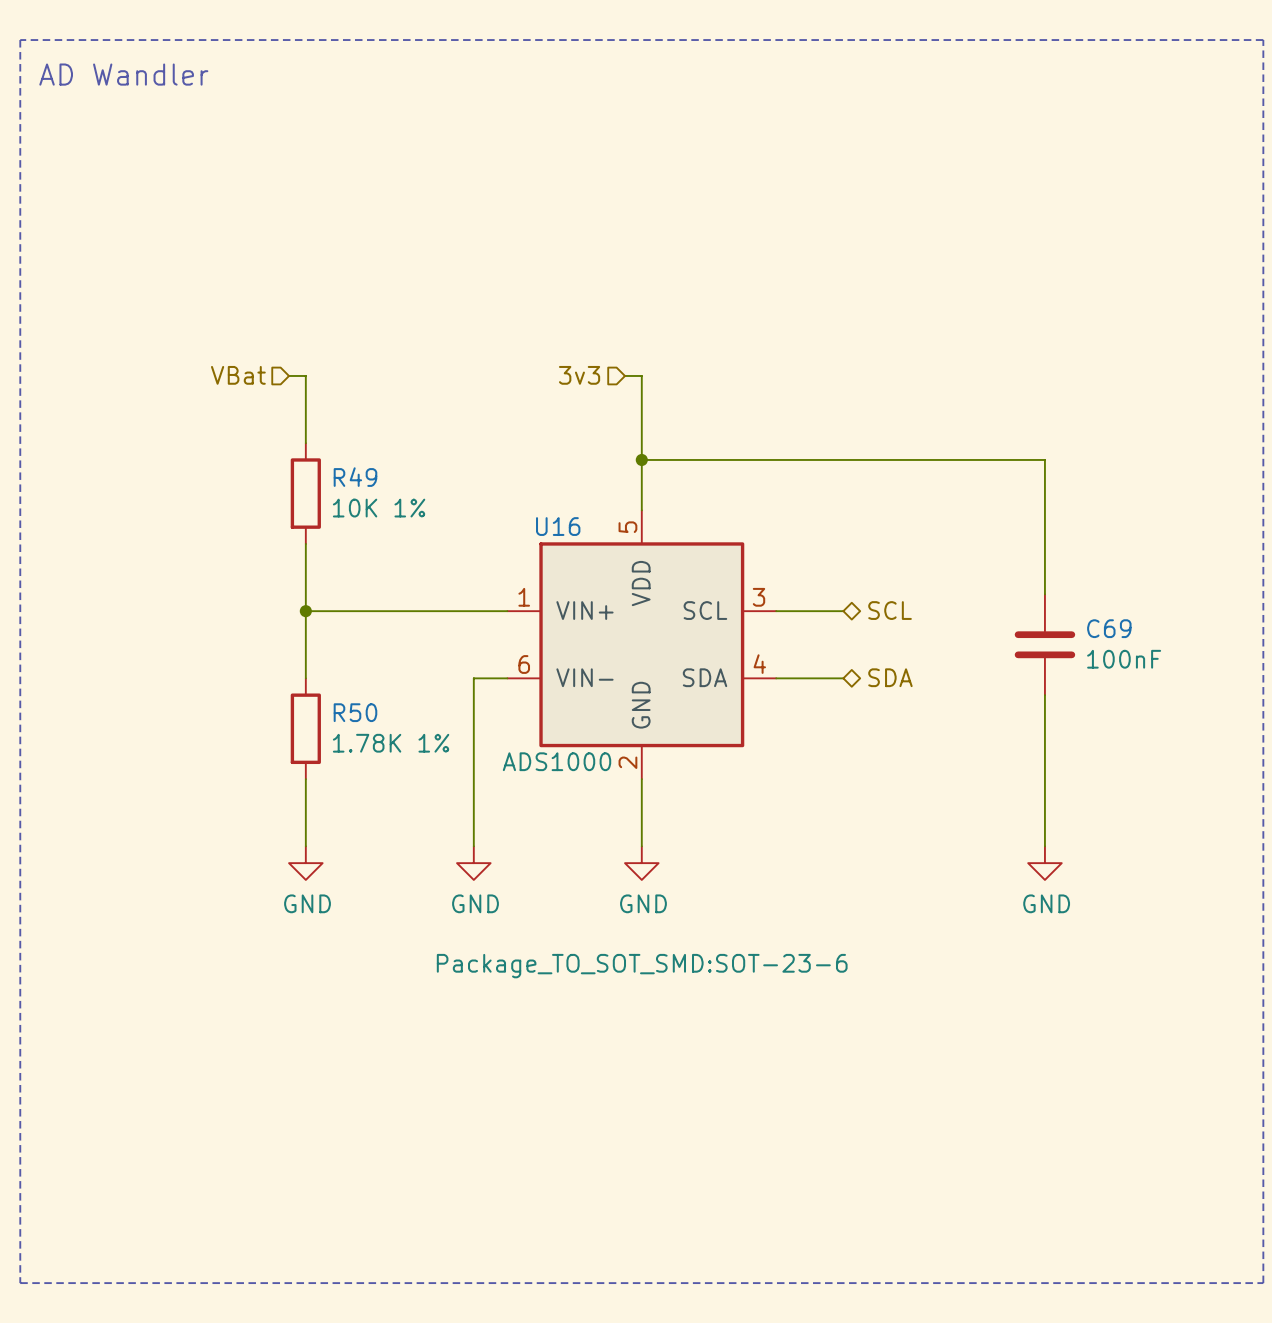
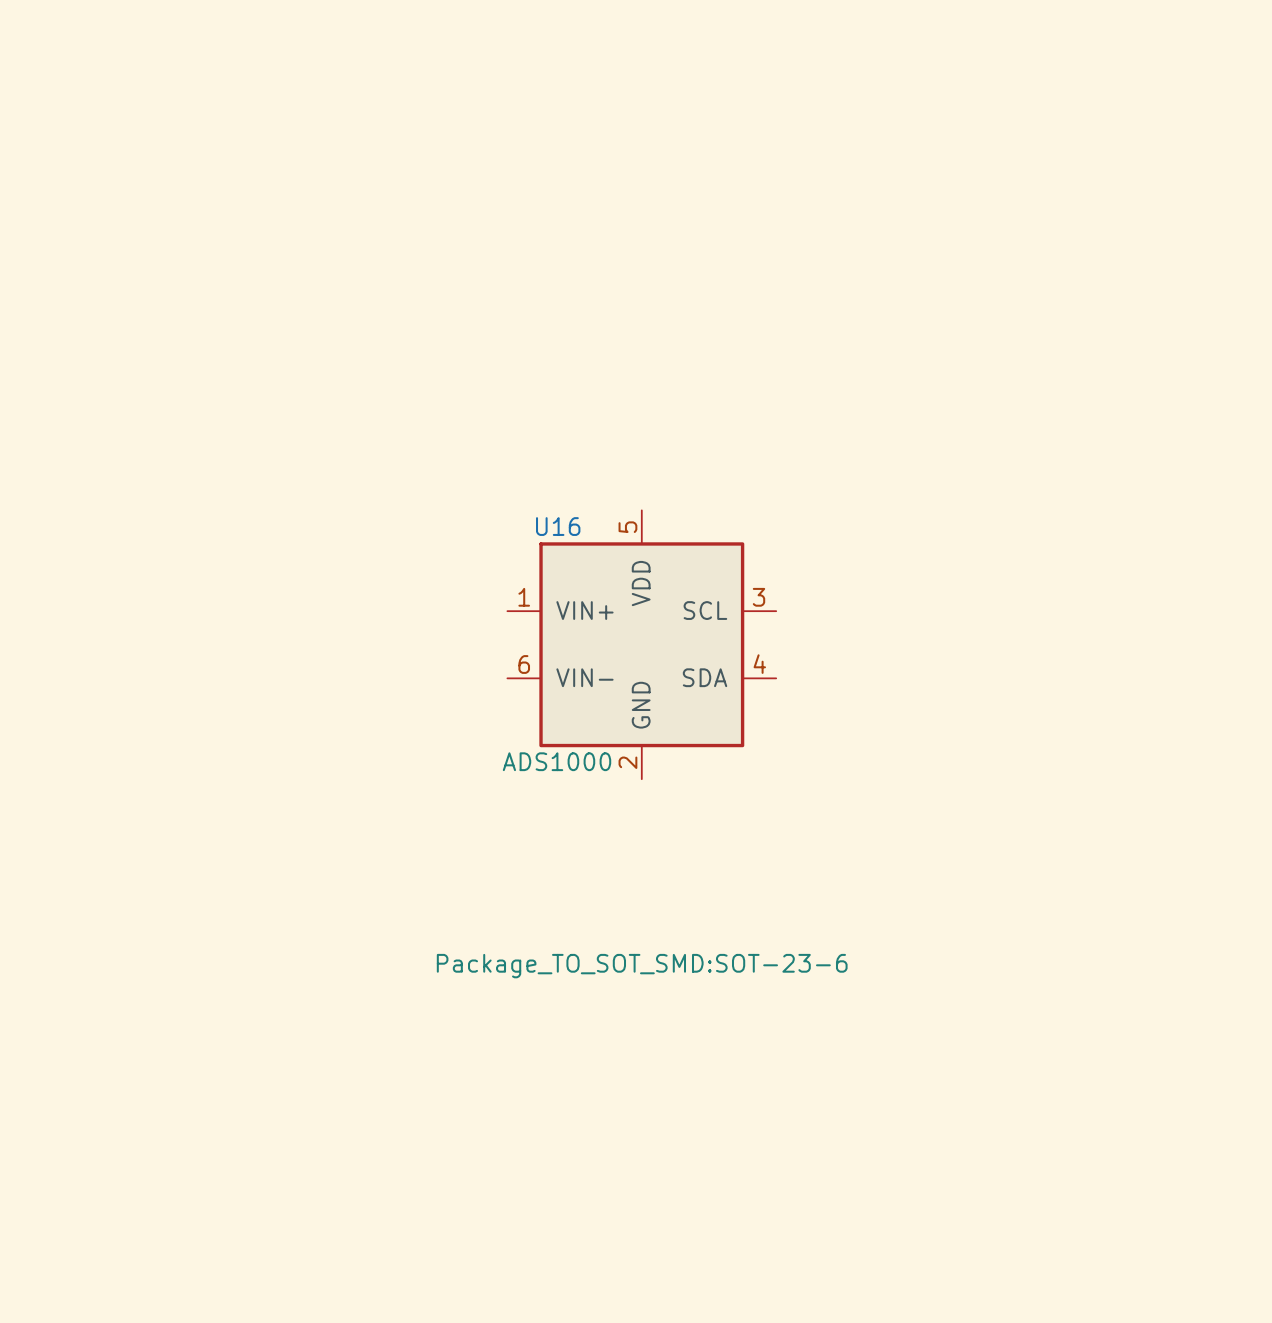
line: (20, 40) (1263, 40) (1263, 1283) (20, 1283) (20, 40) -> none
text: AD Wandler (123, 74) -> none
hierarchical label: VBat (238, 375) -> none
wire: (289, 375) (305, 375) (305, 443) -> none
hierarchical label: 3v3 (579, 375) -> none
wire: (625, 375) (641, 375) (641, 510) -> none
wire: (641, 459) (1044, 459) (1044, 594) -> none
junction: (641, 459) -> none
R49: 10K 1% (305, 493) -> none
wire: (305, 543) (305, 678) -> none
hierarchical label: SCL (890, 610) -> none
wire: (305, 611) (507, 611) -> none
junction: (305, 611) -> none
wire: (776, 611) (843, 611) -> none
C69: 100nF (1044, 644) -> none
hierarchical label: SDA (890, 677) -> none
wire: (507, 678) (473, 678) (473, 846) -> none
wire: (776, 678) (843, 678) -> none
wire: (1044, 695) (1044, 846) -> none
R50: 1.78K 1% (305, 728) -> none
wire: (305, 779) (305, 846) -> none
wire: (641, 779) (641, 846) -> none
power symbol: GND (305, 863) -> none
power symbol: GND (473, 863) -> none
power symbol: GND (641, 863) -> none
power symbol: GND (1044, 863) -> none

